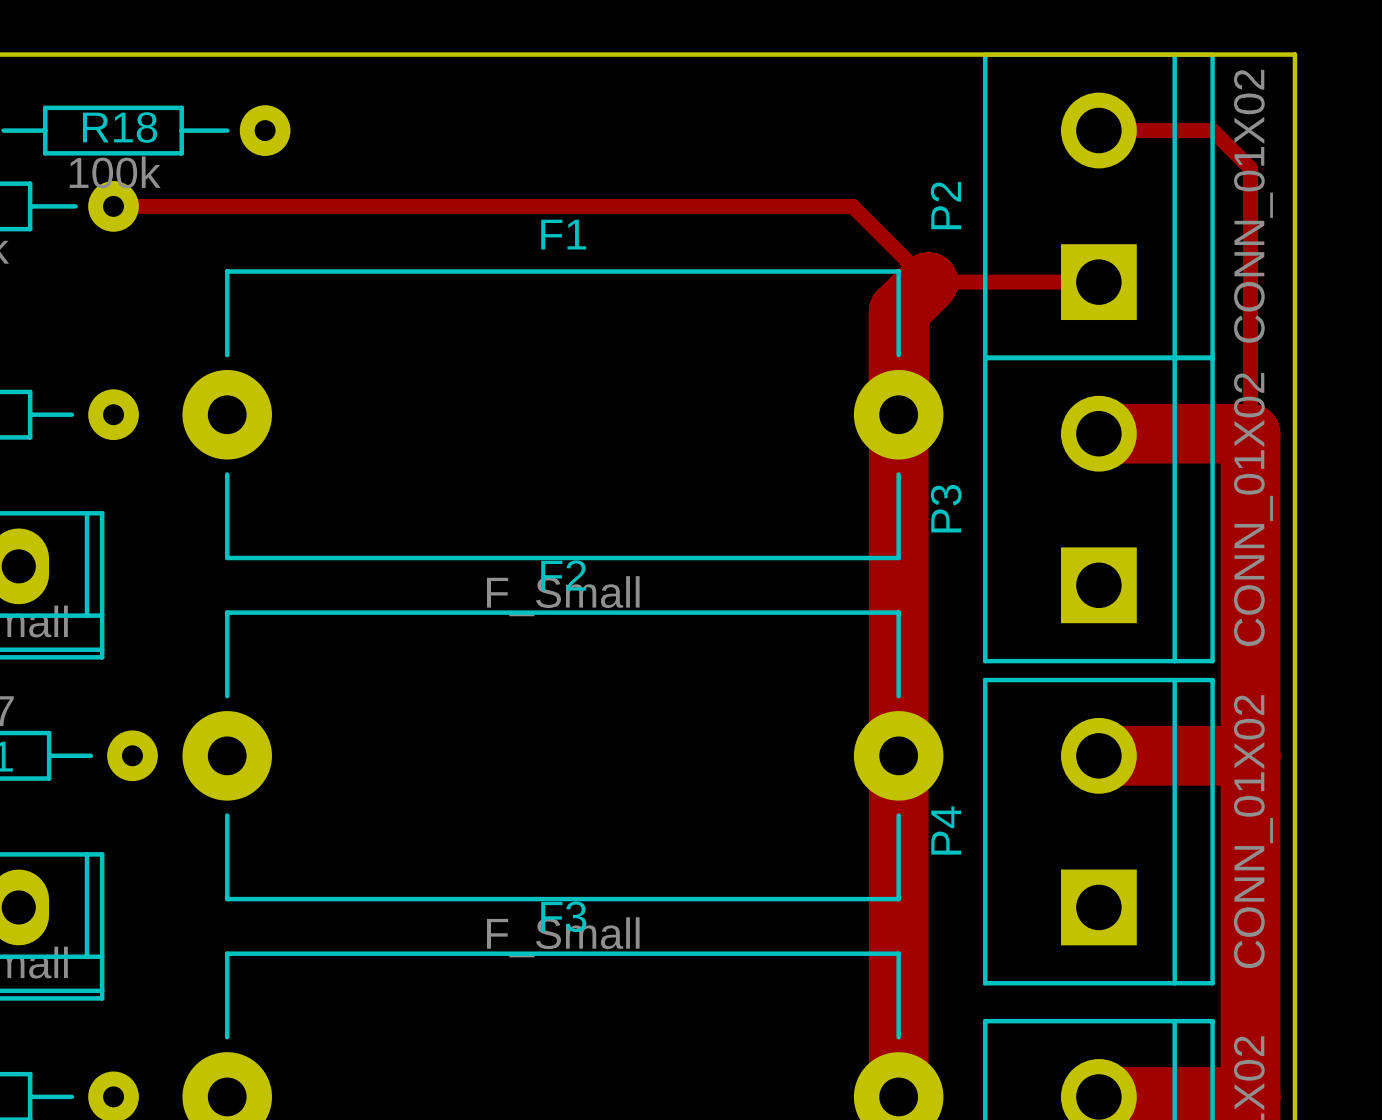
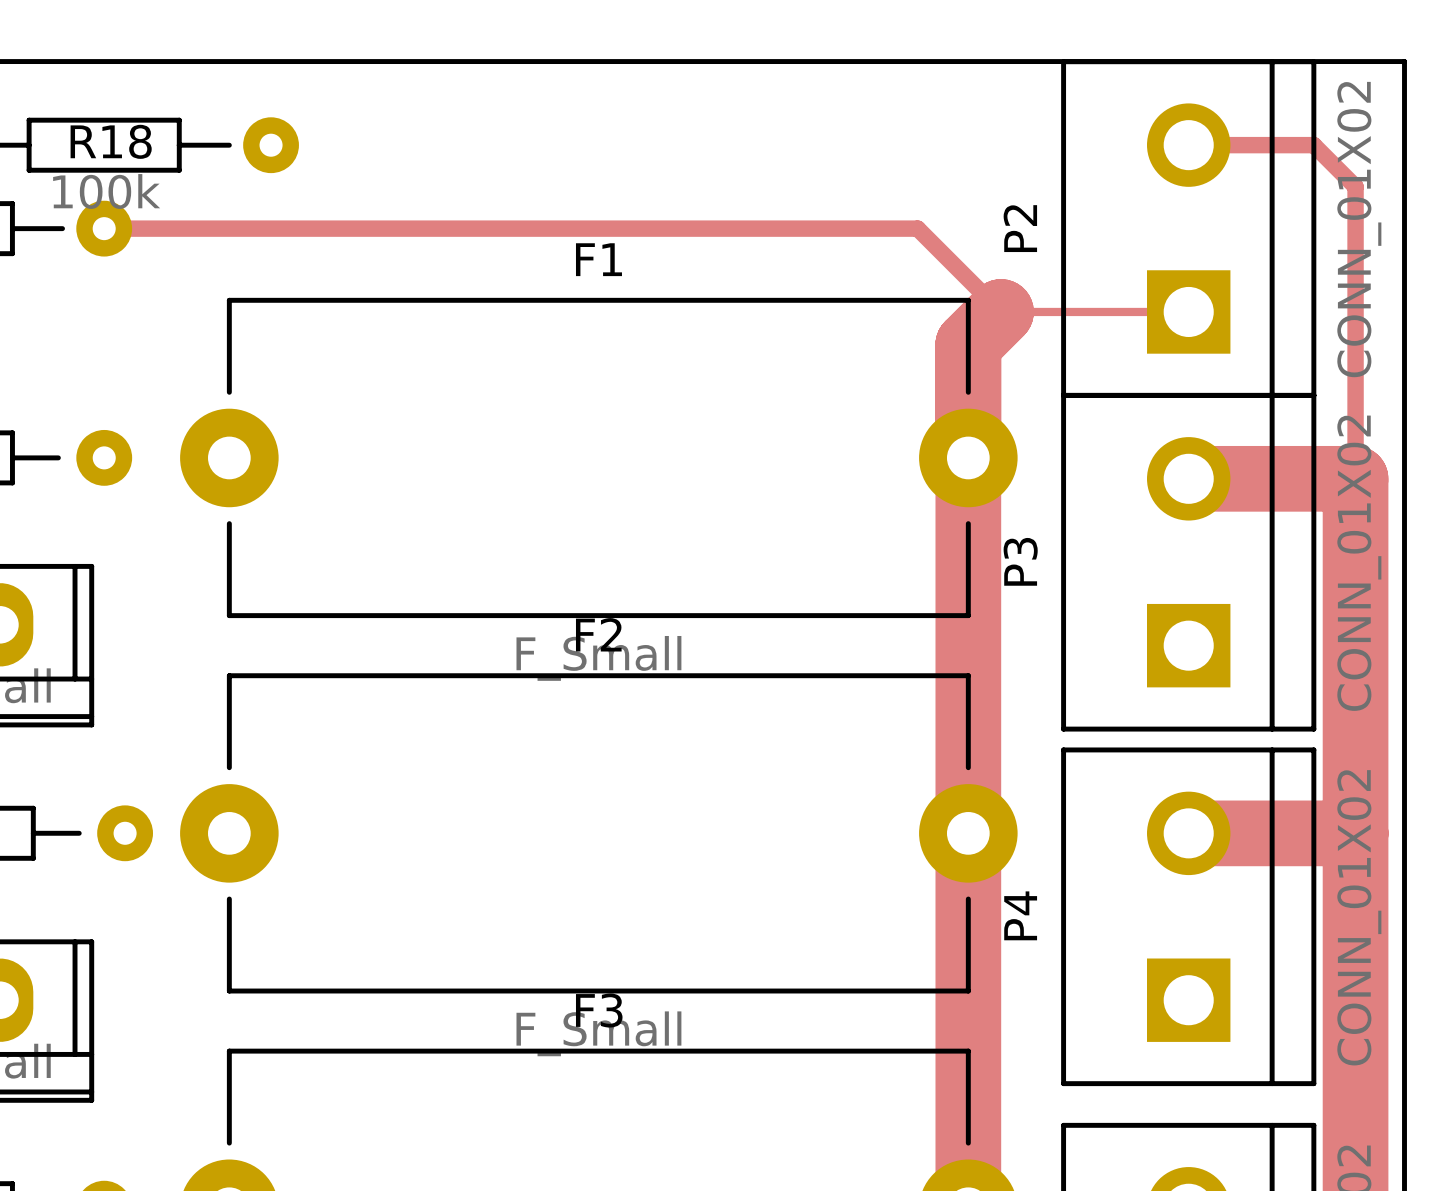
track width: thick (928, 282) (1098, 282) -> thin (1001, 311) (1188, 311)

